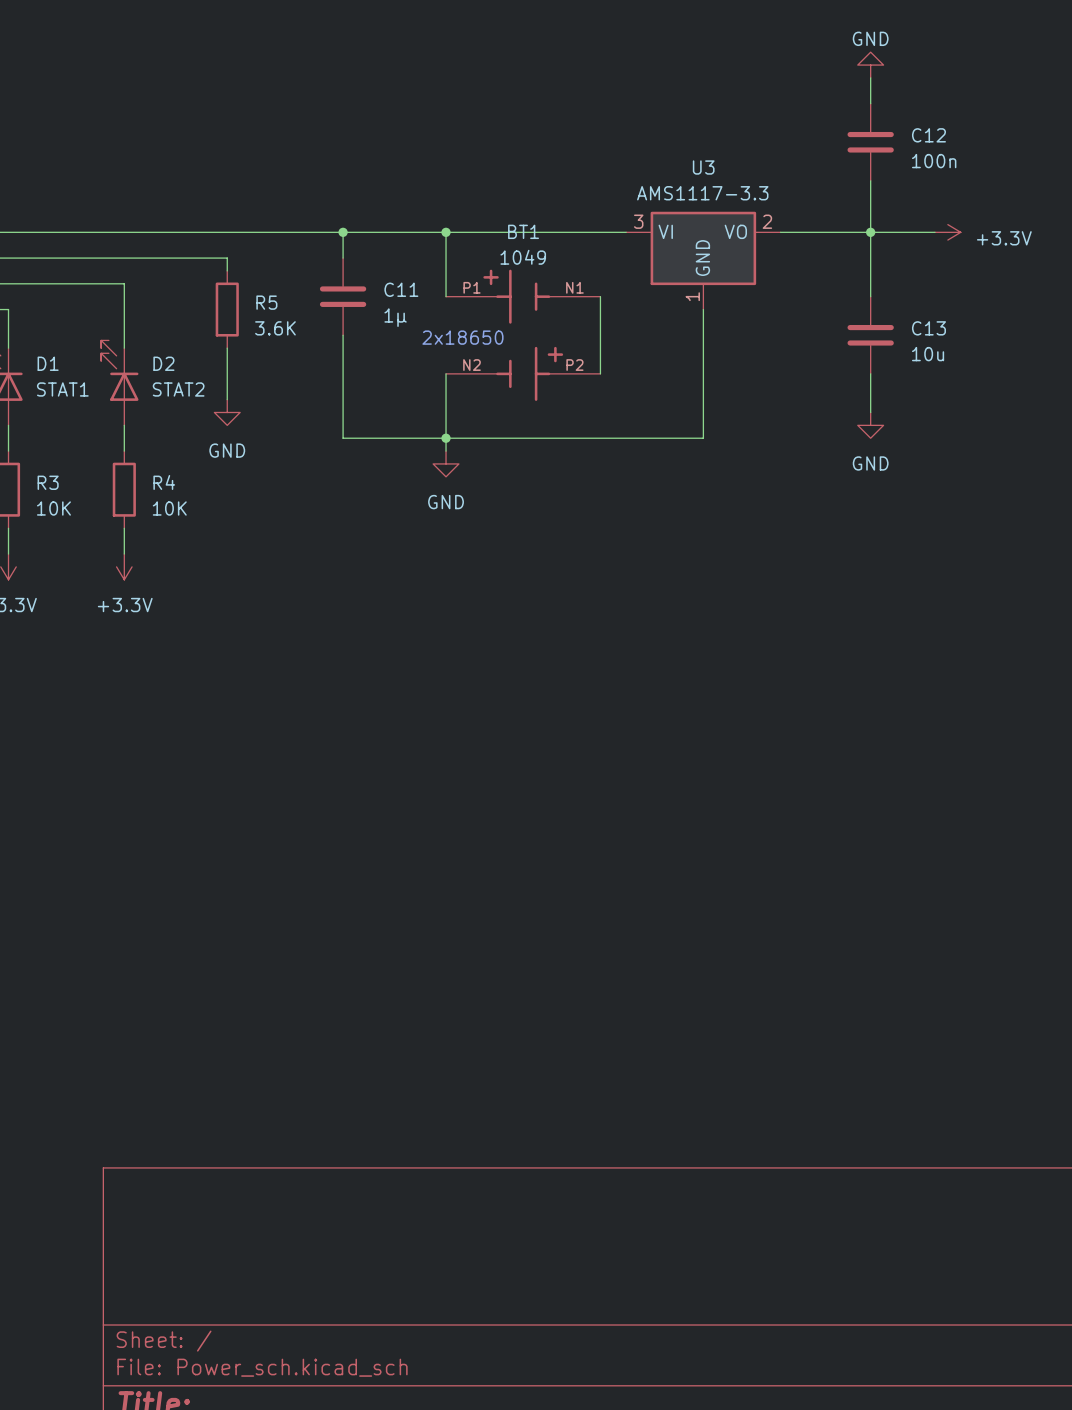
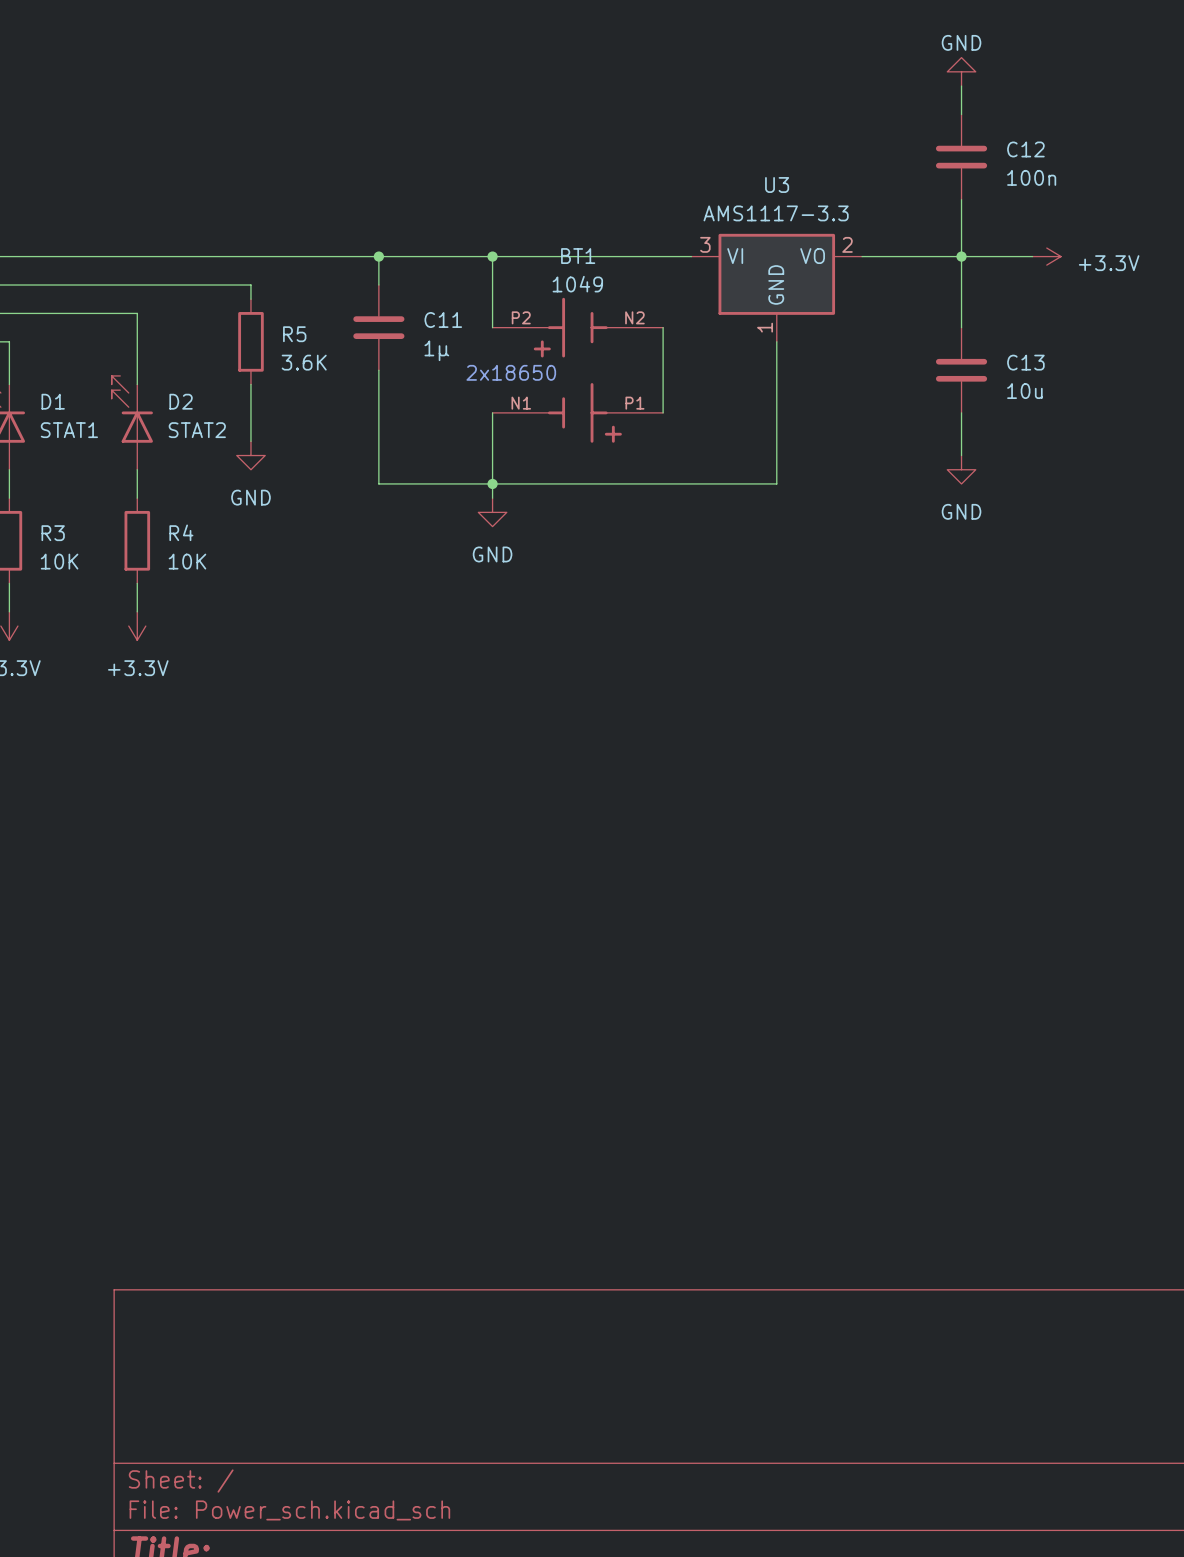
BT1 rotation: 0° (523, 335) -> 180° (577, 370)

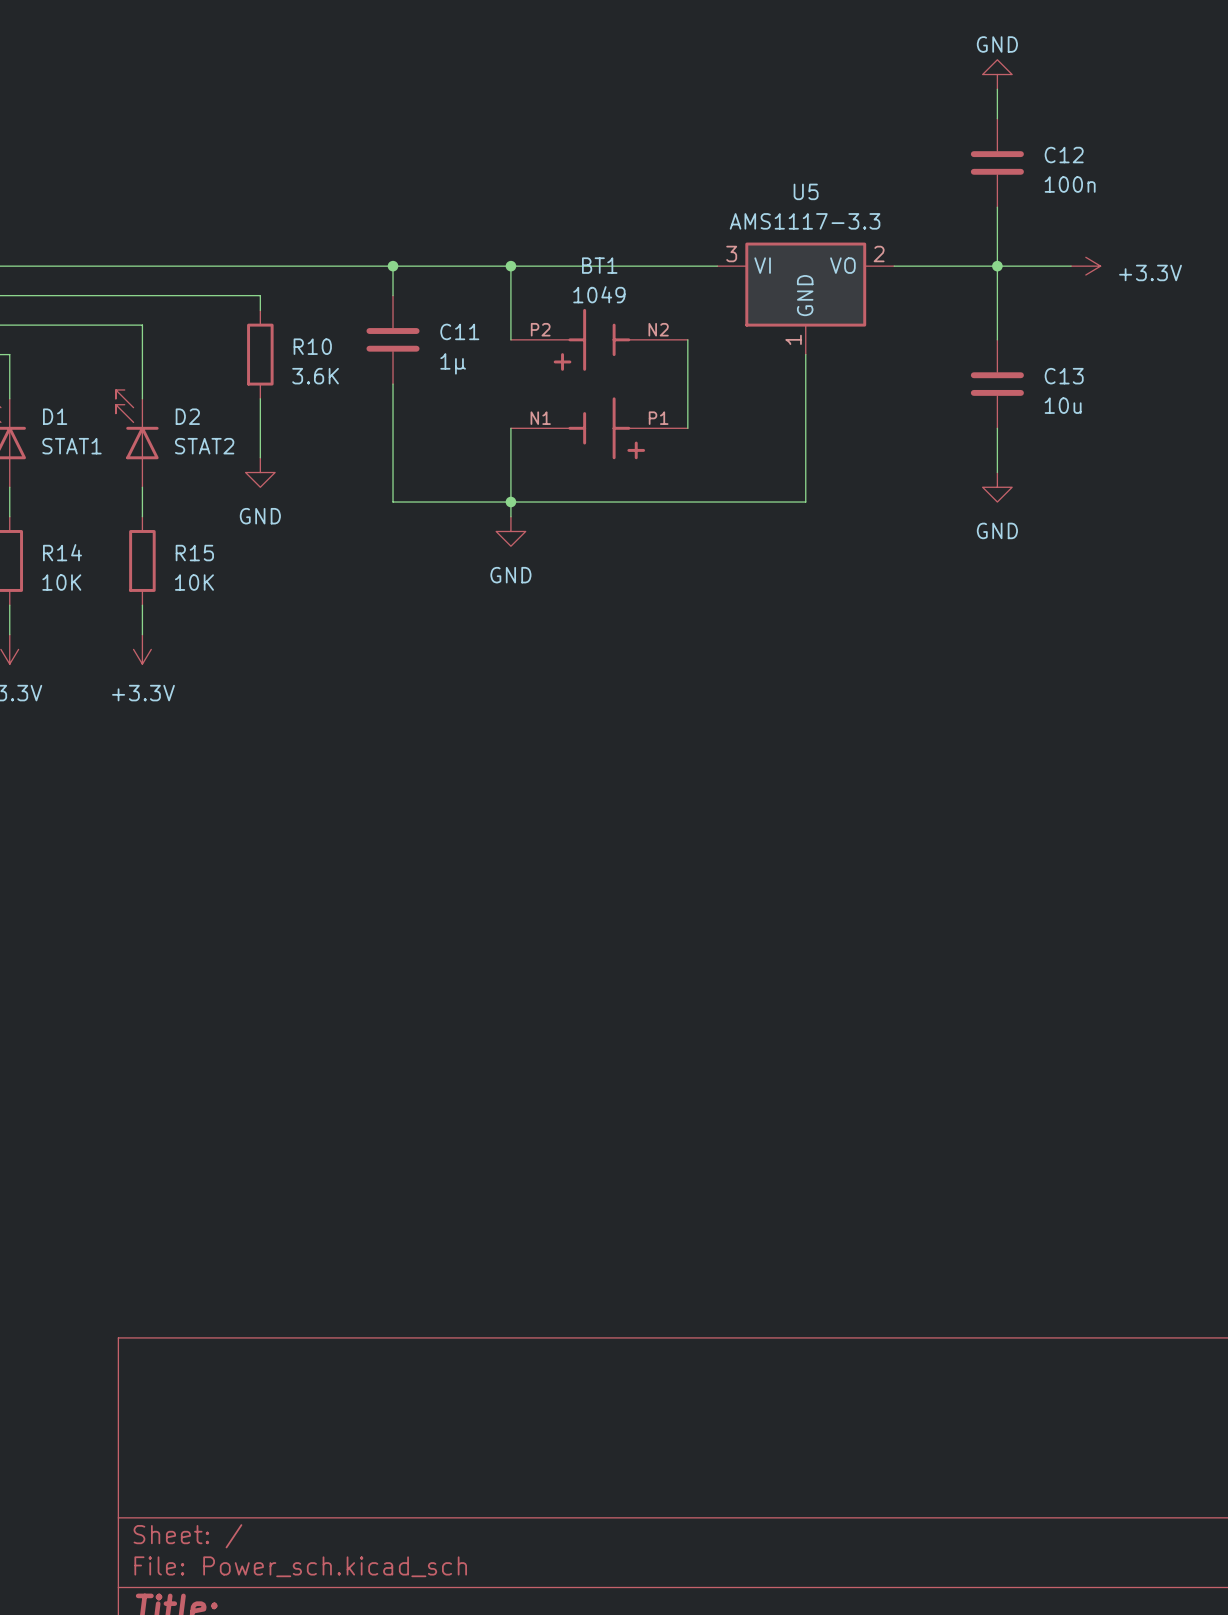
U3 name: U3 (777, 184) -> U5 (806, 191)
R5 name: R5 (294, 334) -> R10 (312, 346)
text: 2x18650 (511, 372) -> none
R4 name: R4 (181, 532) -> R15 (194, 553)
R3 name: R3 (53, 533) -> R14 (62, 552)

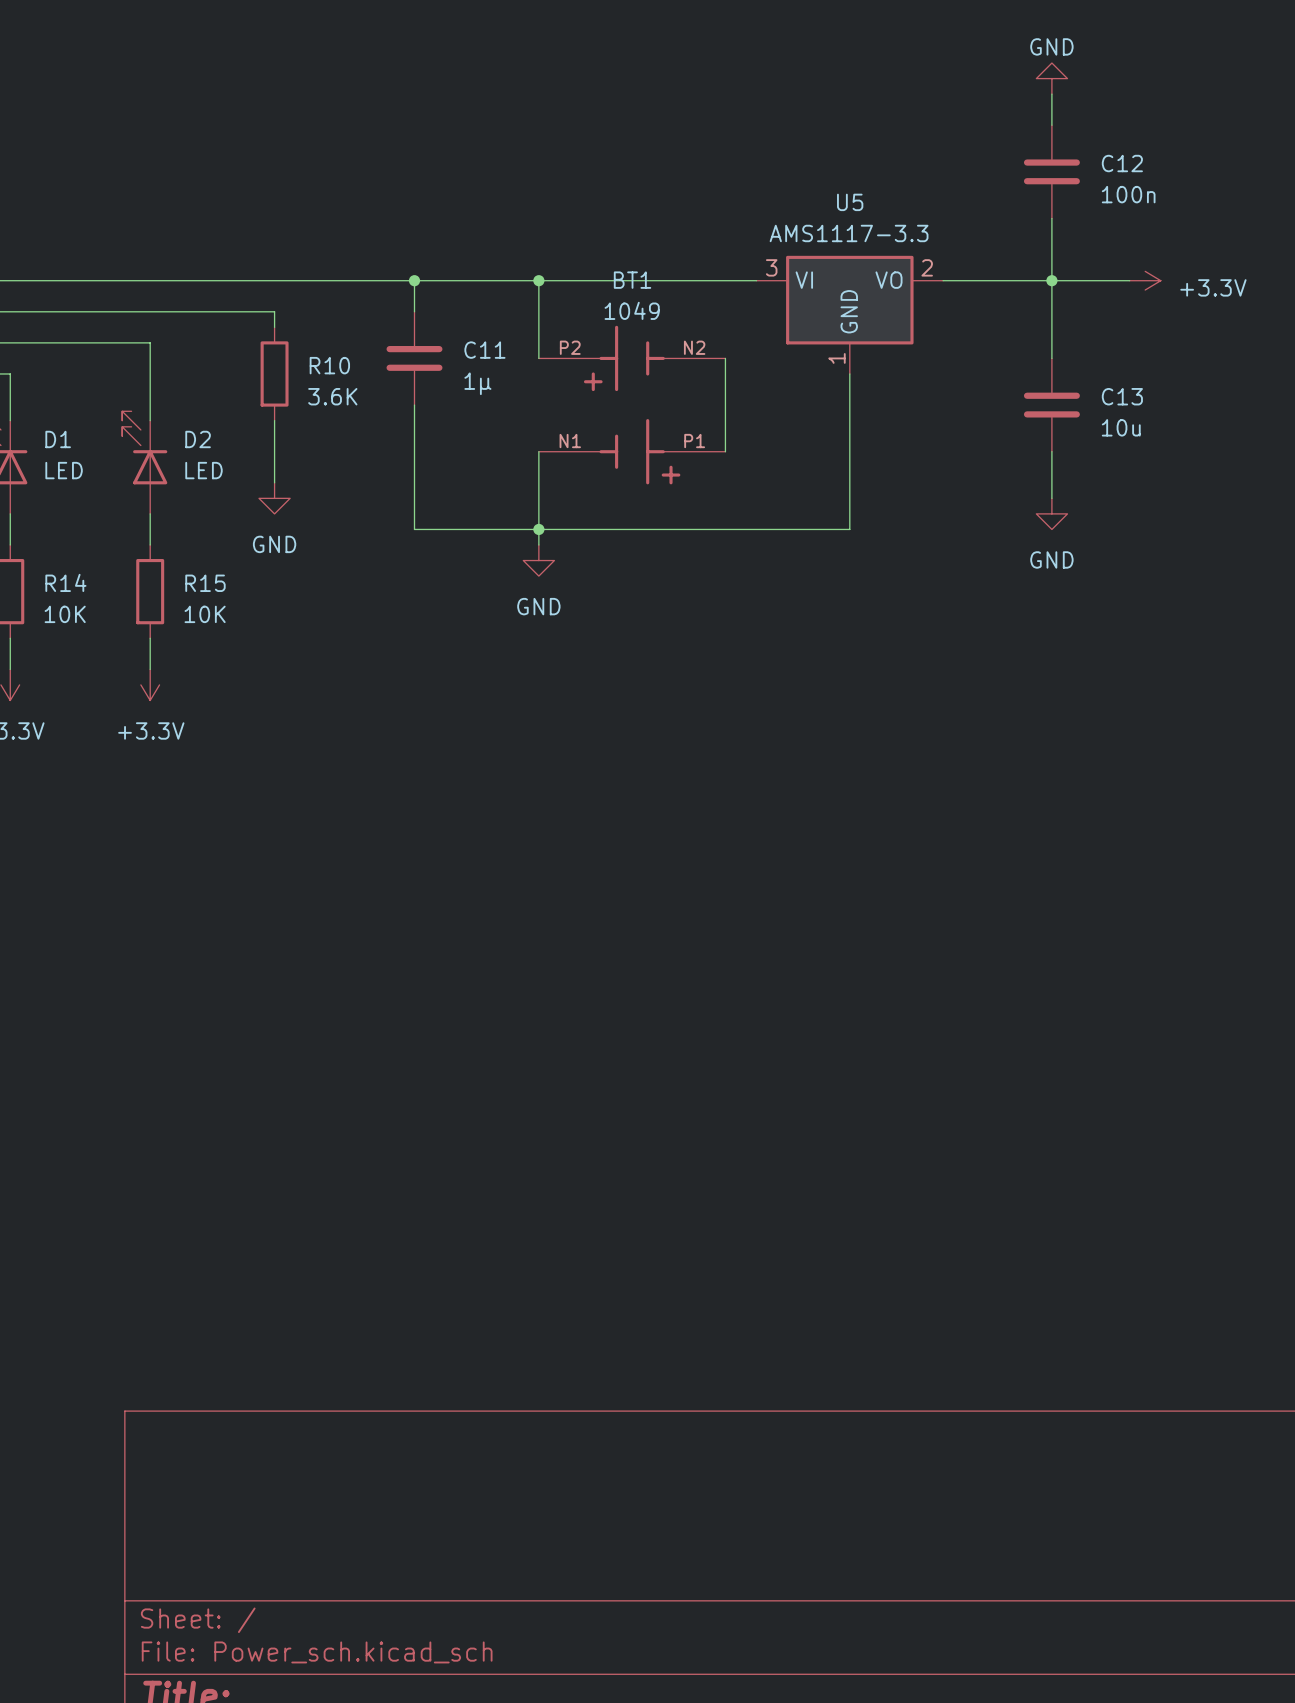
D1 value: STAT1 (71, 446) -> LED (64, 470)
D2 value: STAT2 (204, 446) -> LED (203, 470)

